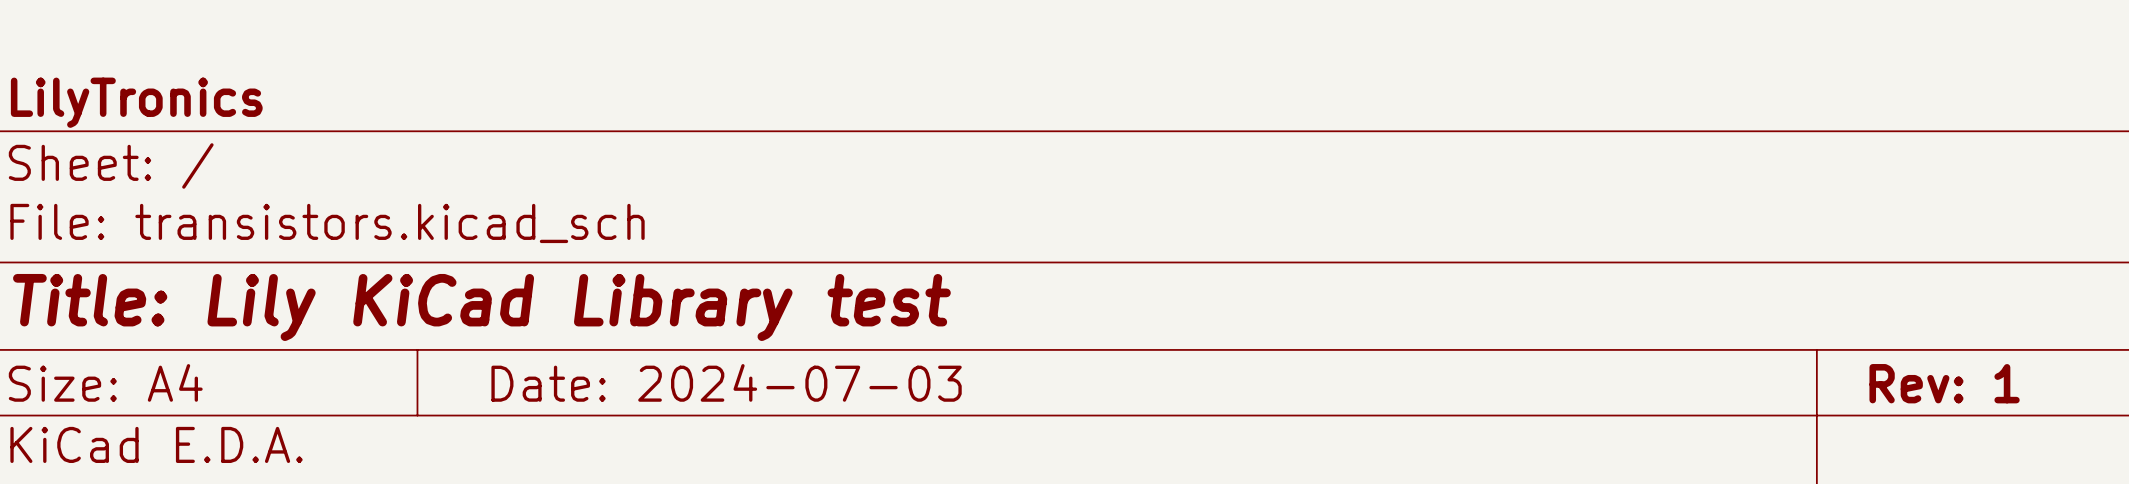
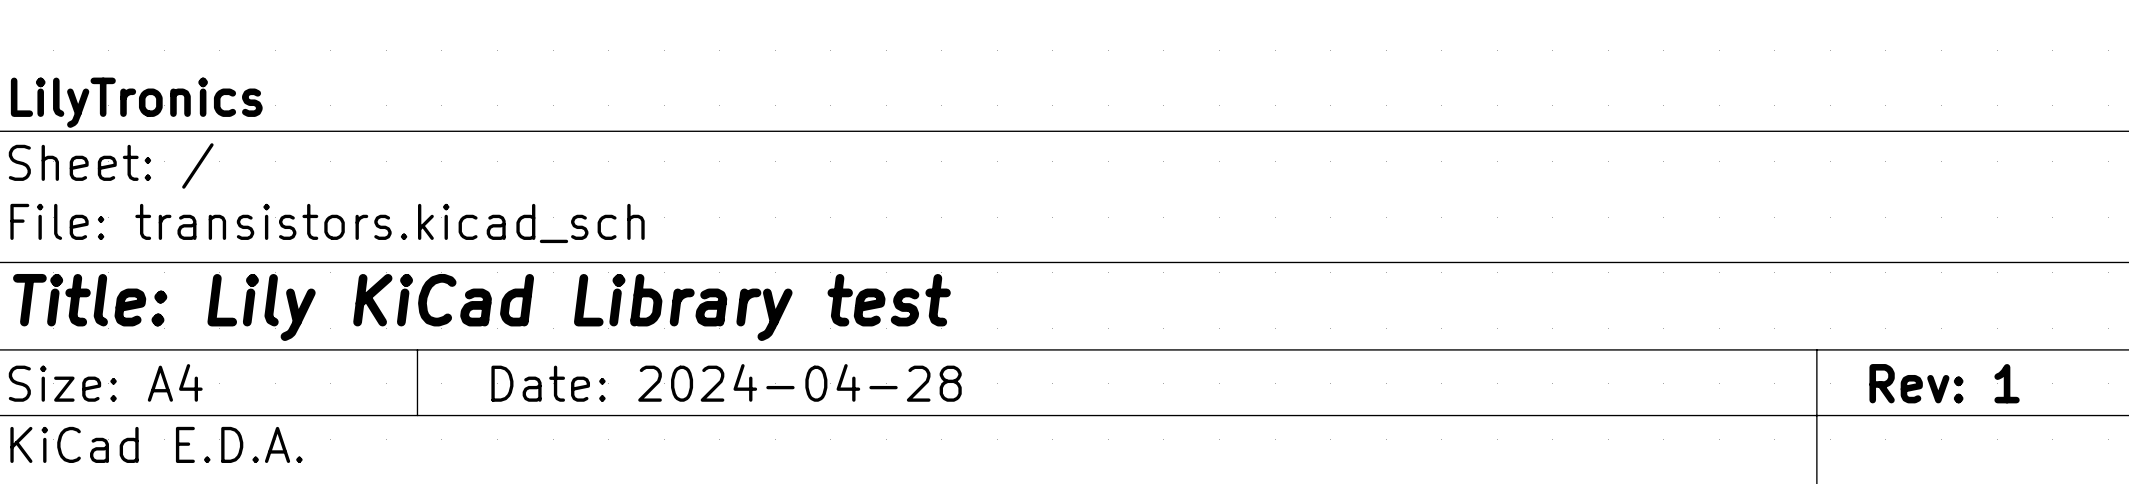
title block: Date: 2024-07-03 (726, 382) -> Date: 2024-04-28 (726, 382)

